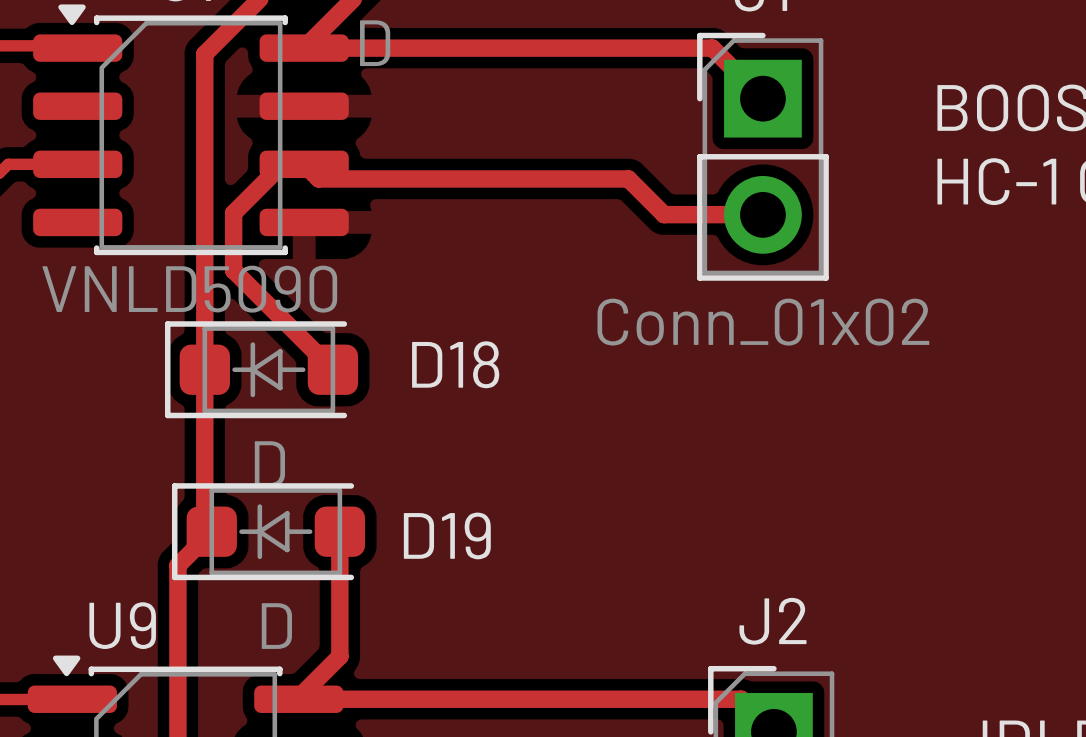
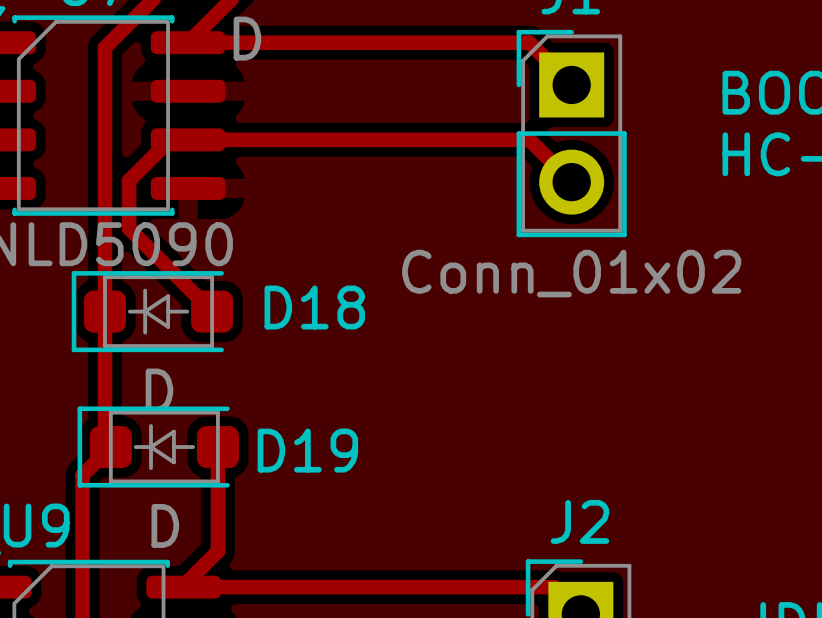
track: (304, 164) (318, 178) (628, 178) (664, 214) (762, 214) -> (188, 139) (529, 139) (571, 181)

